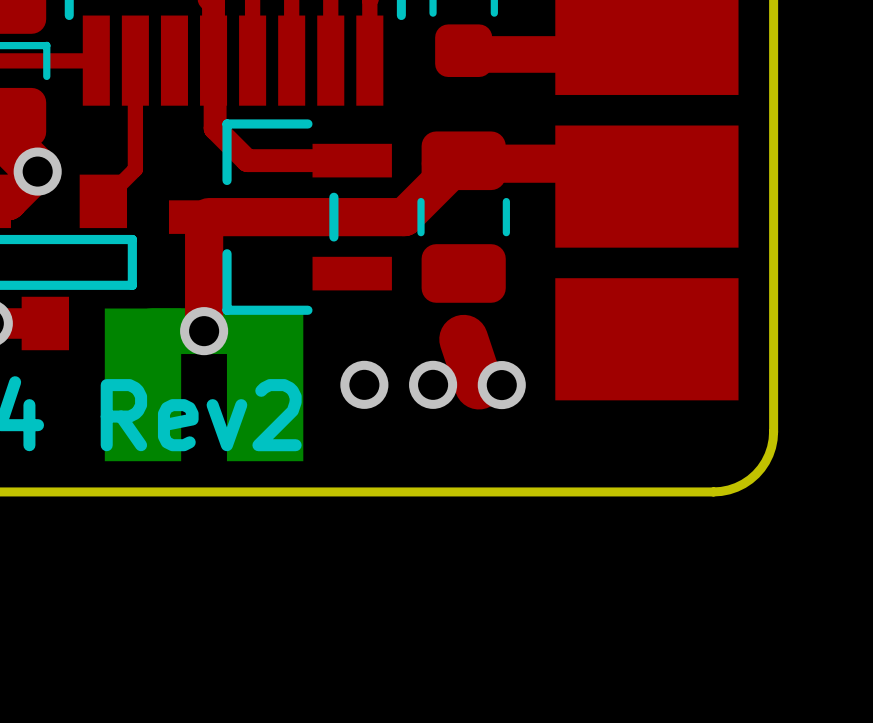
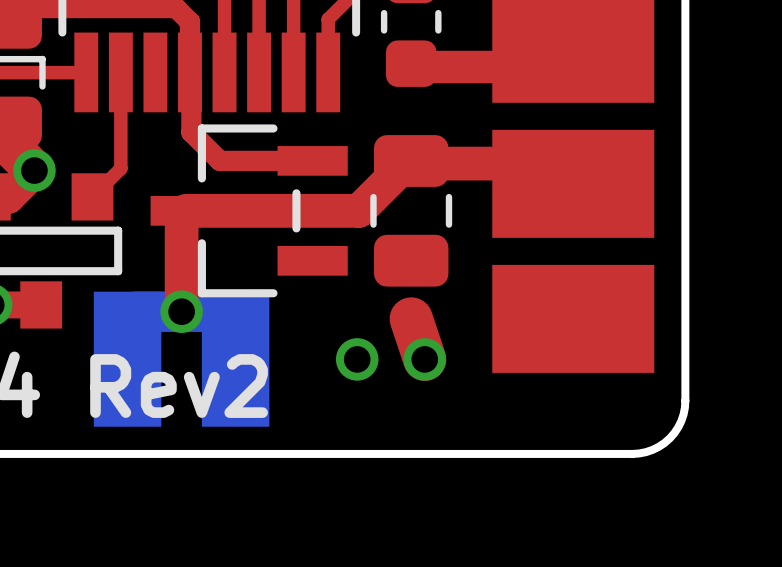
via: (364, 384) -> none
via: (433, 384) -> none
via: none -> (357, 359)
via: none -> (424, 359)
via: (501, 385) -> none

